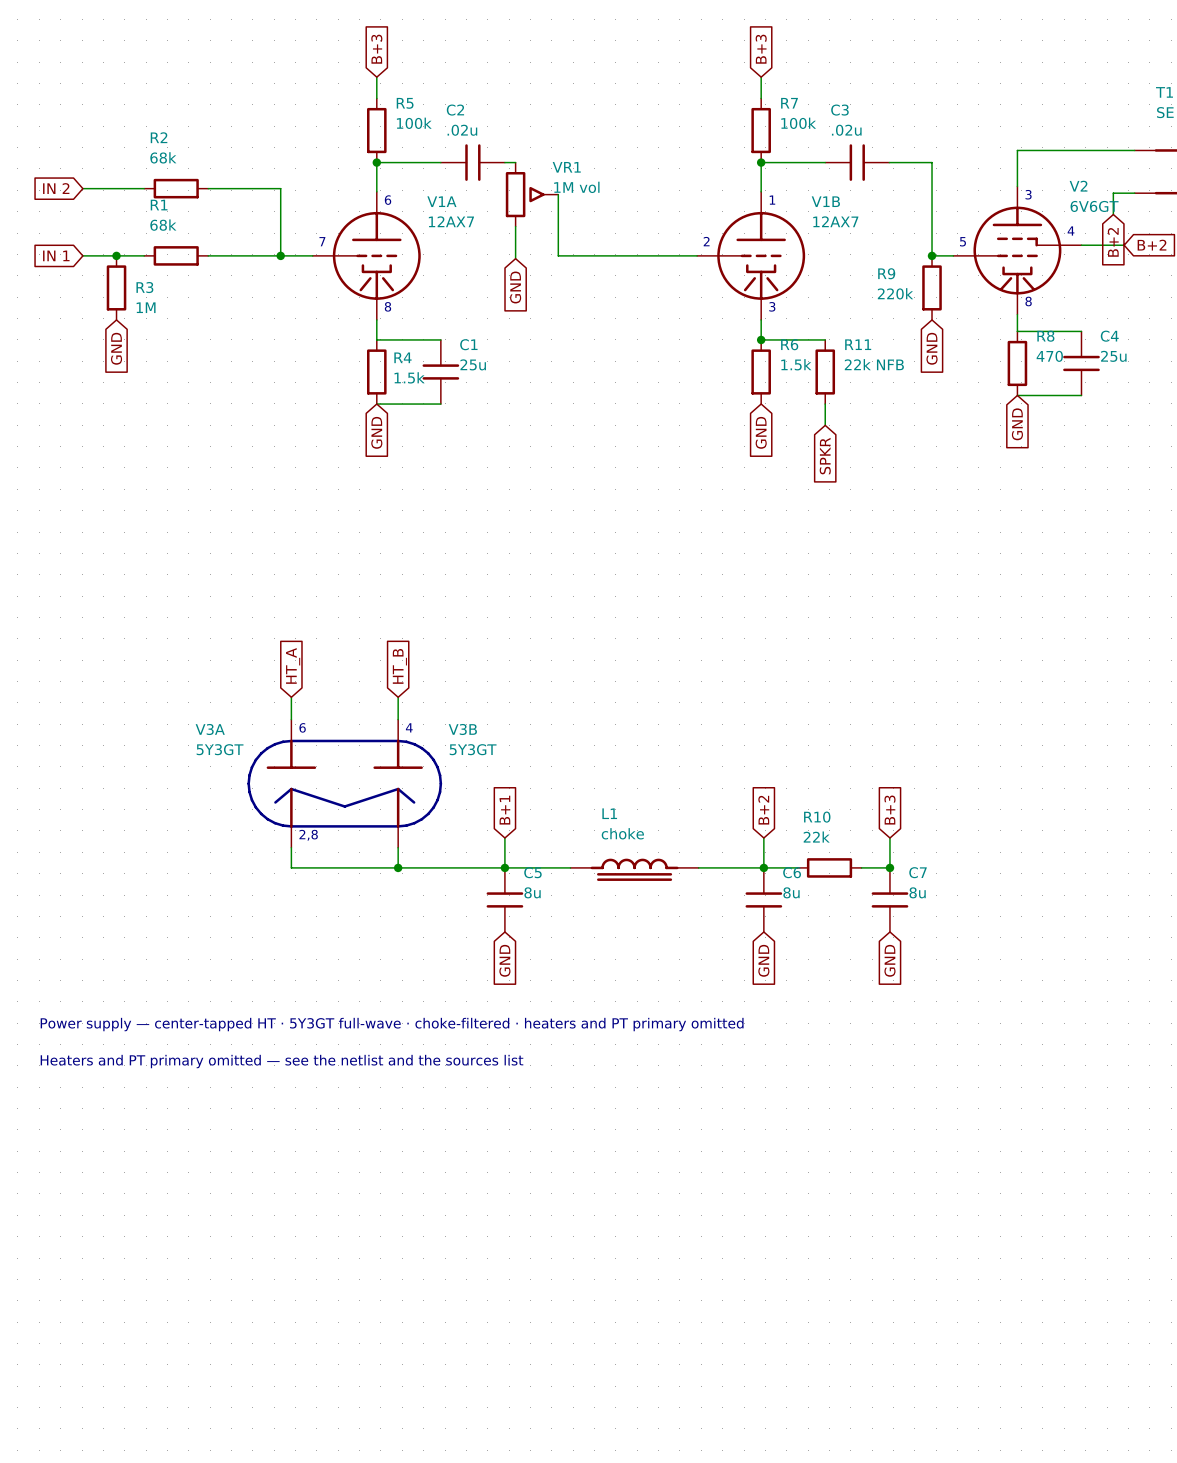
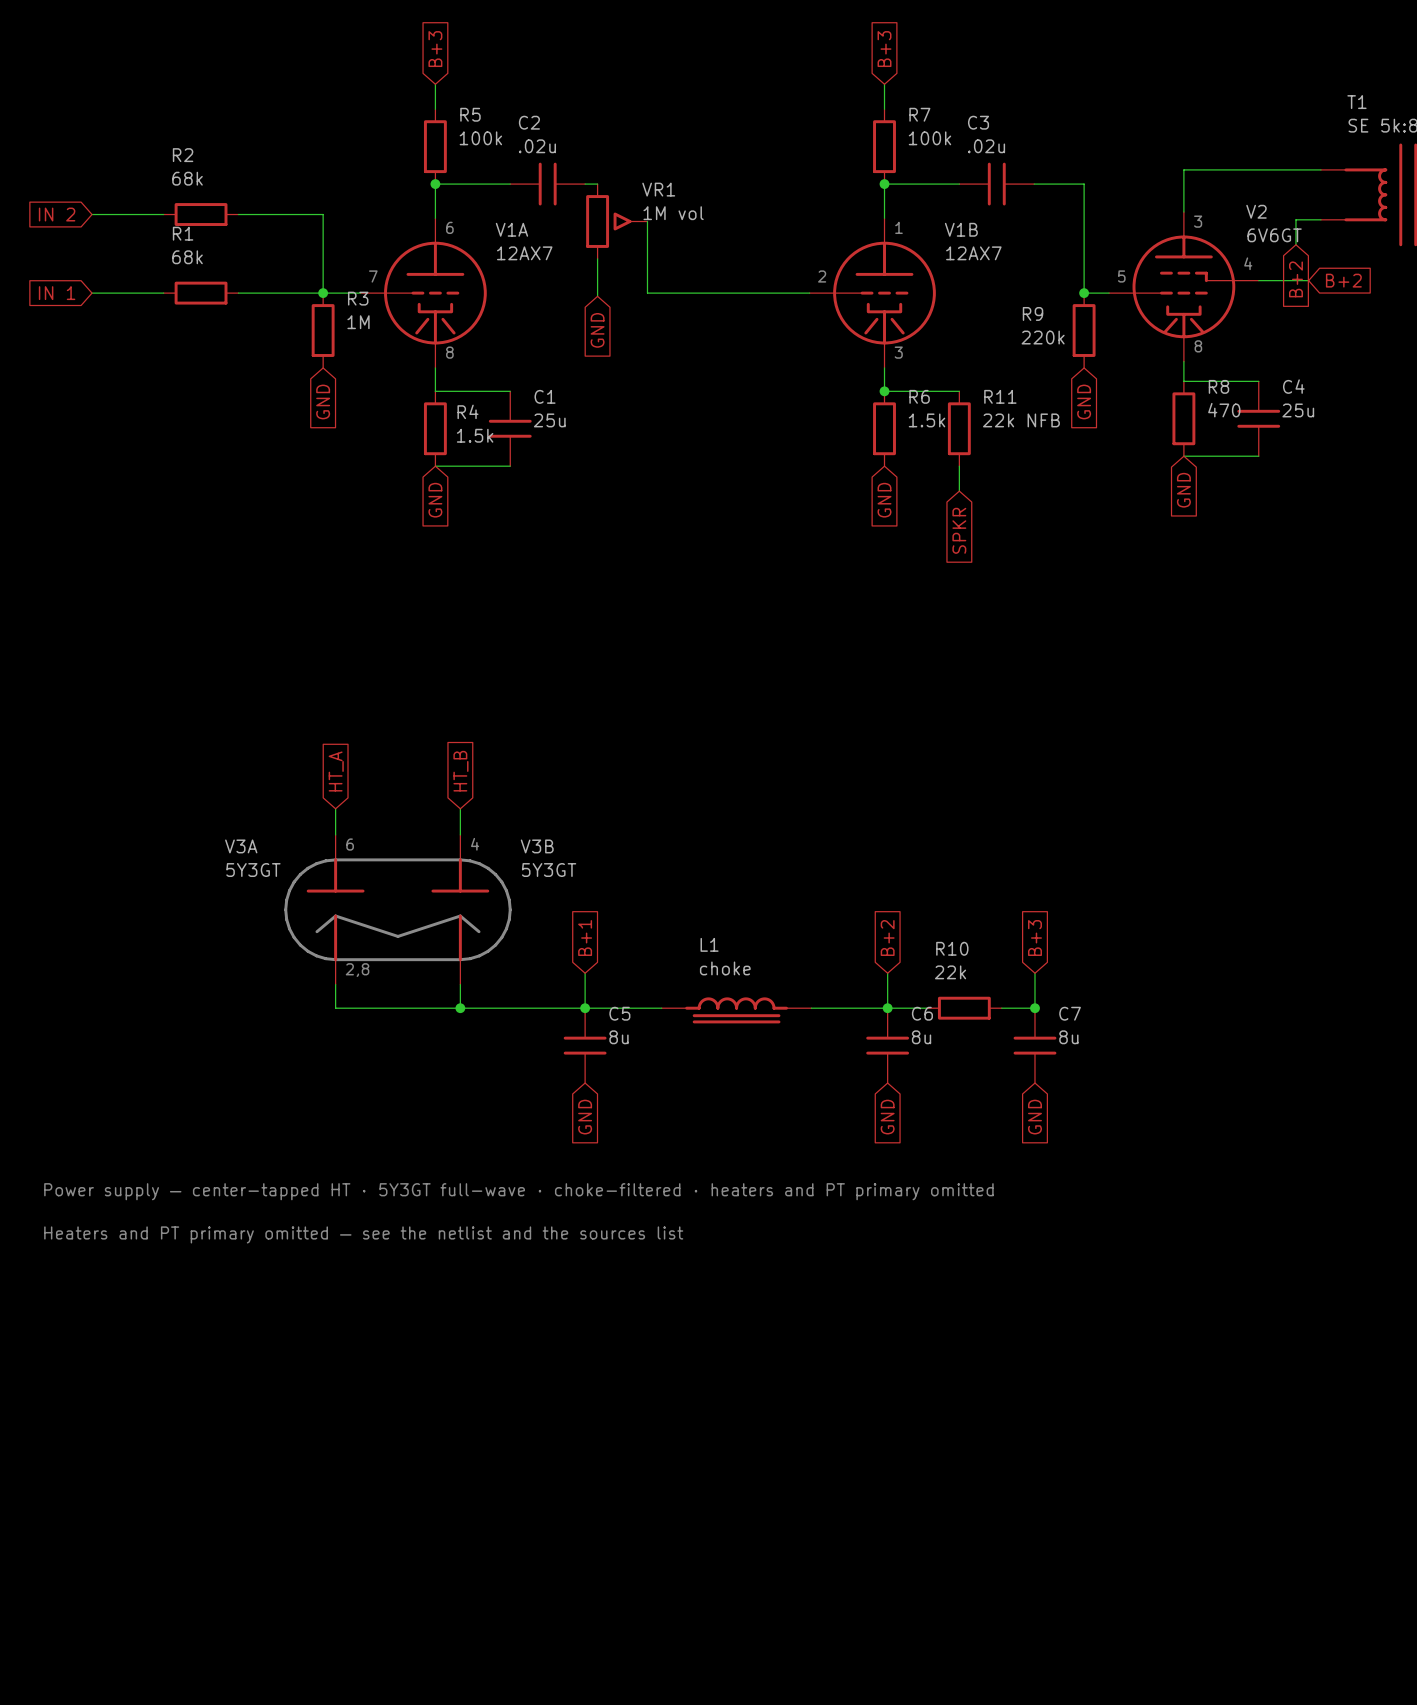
junction: (116, 255) -> none
R3 position: (116, 287) -> (323, 330)
R3 name position: R3 (144, 287) -> R3 (358, 298)
R3 value position: 1M (146, 307) -> 1M (358, 322)
global label position: GND (116, 348) -> GND (323, 401)

